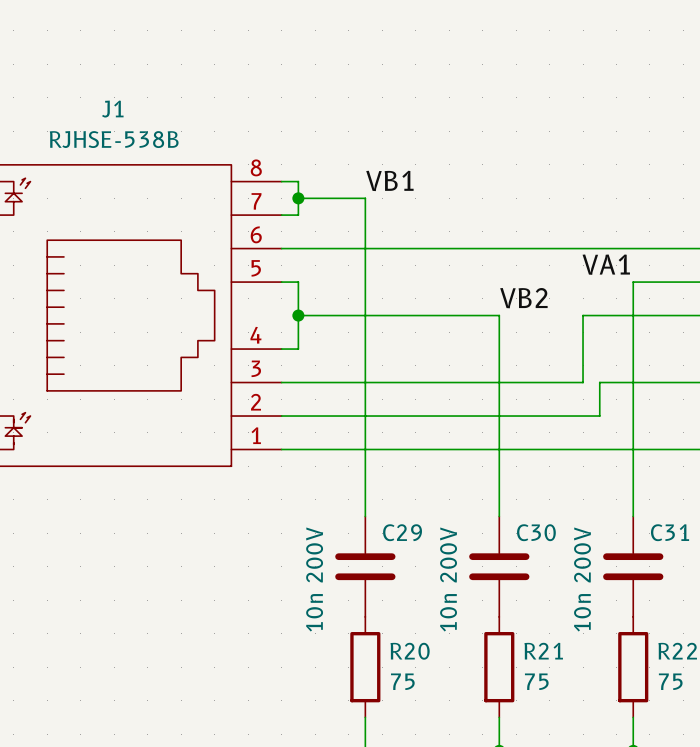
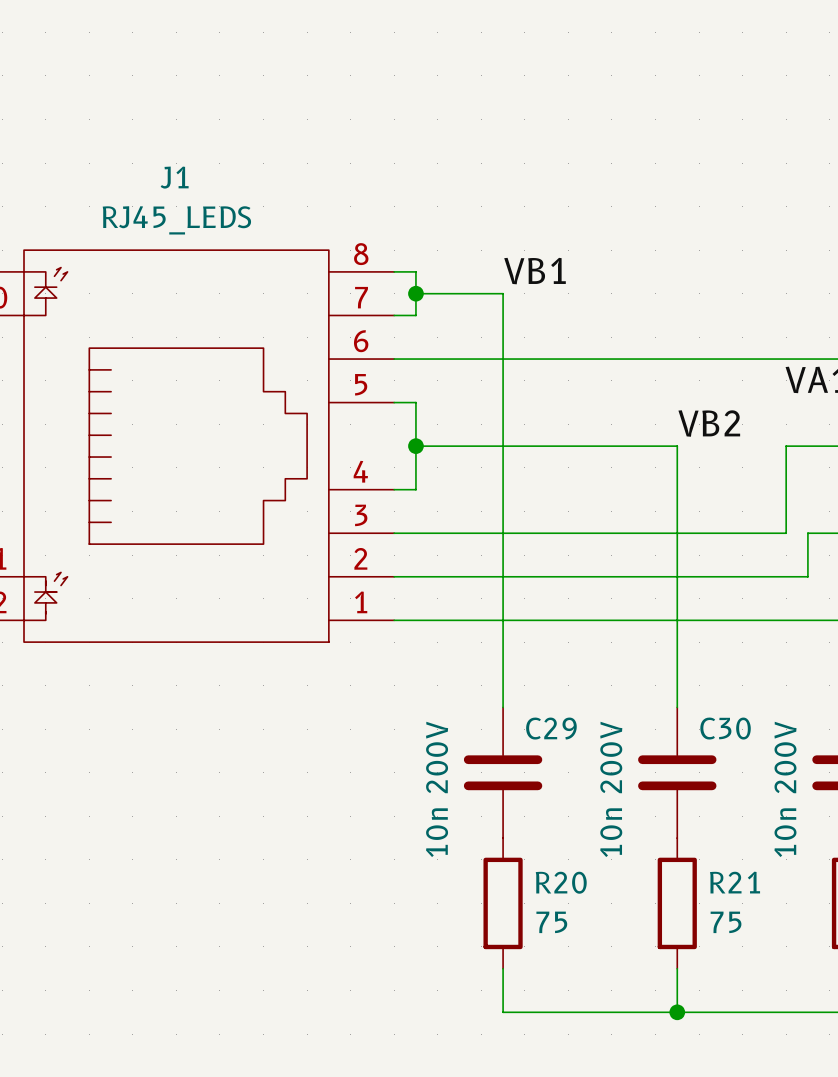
J1 value: RJHSE-538B (114, 139) -> RJ45_LEDS (176, 220)

